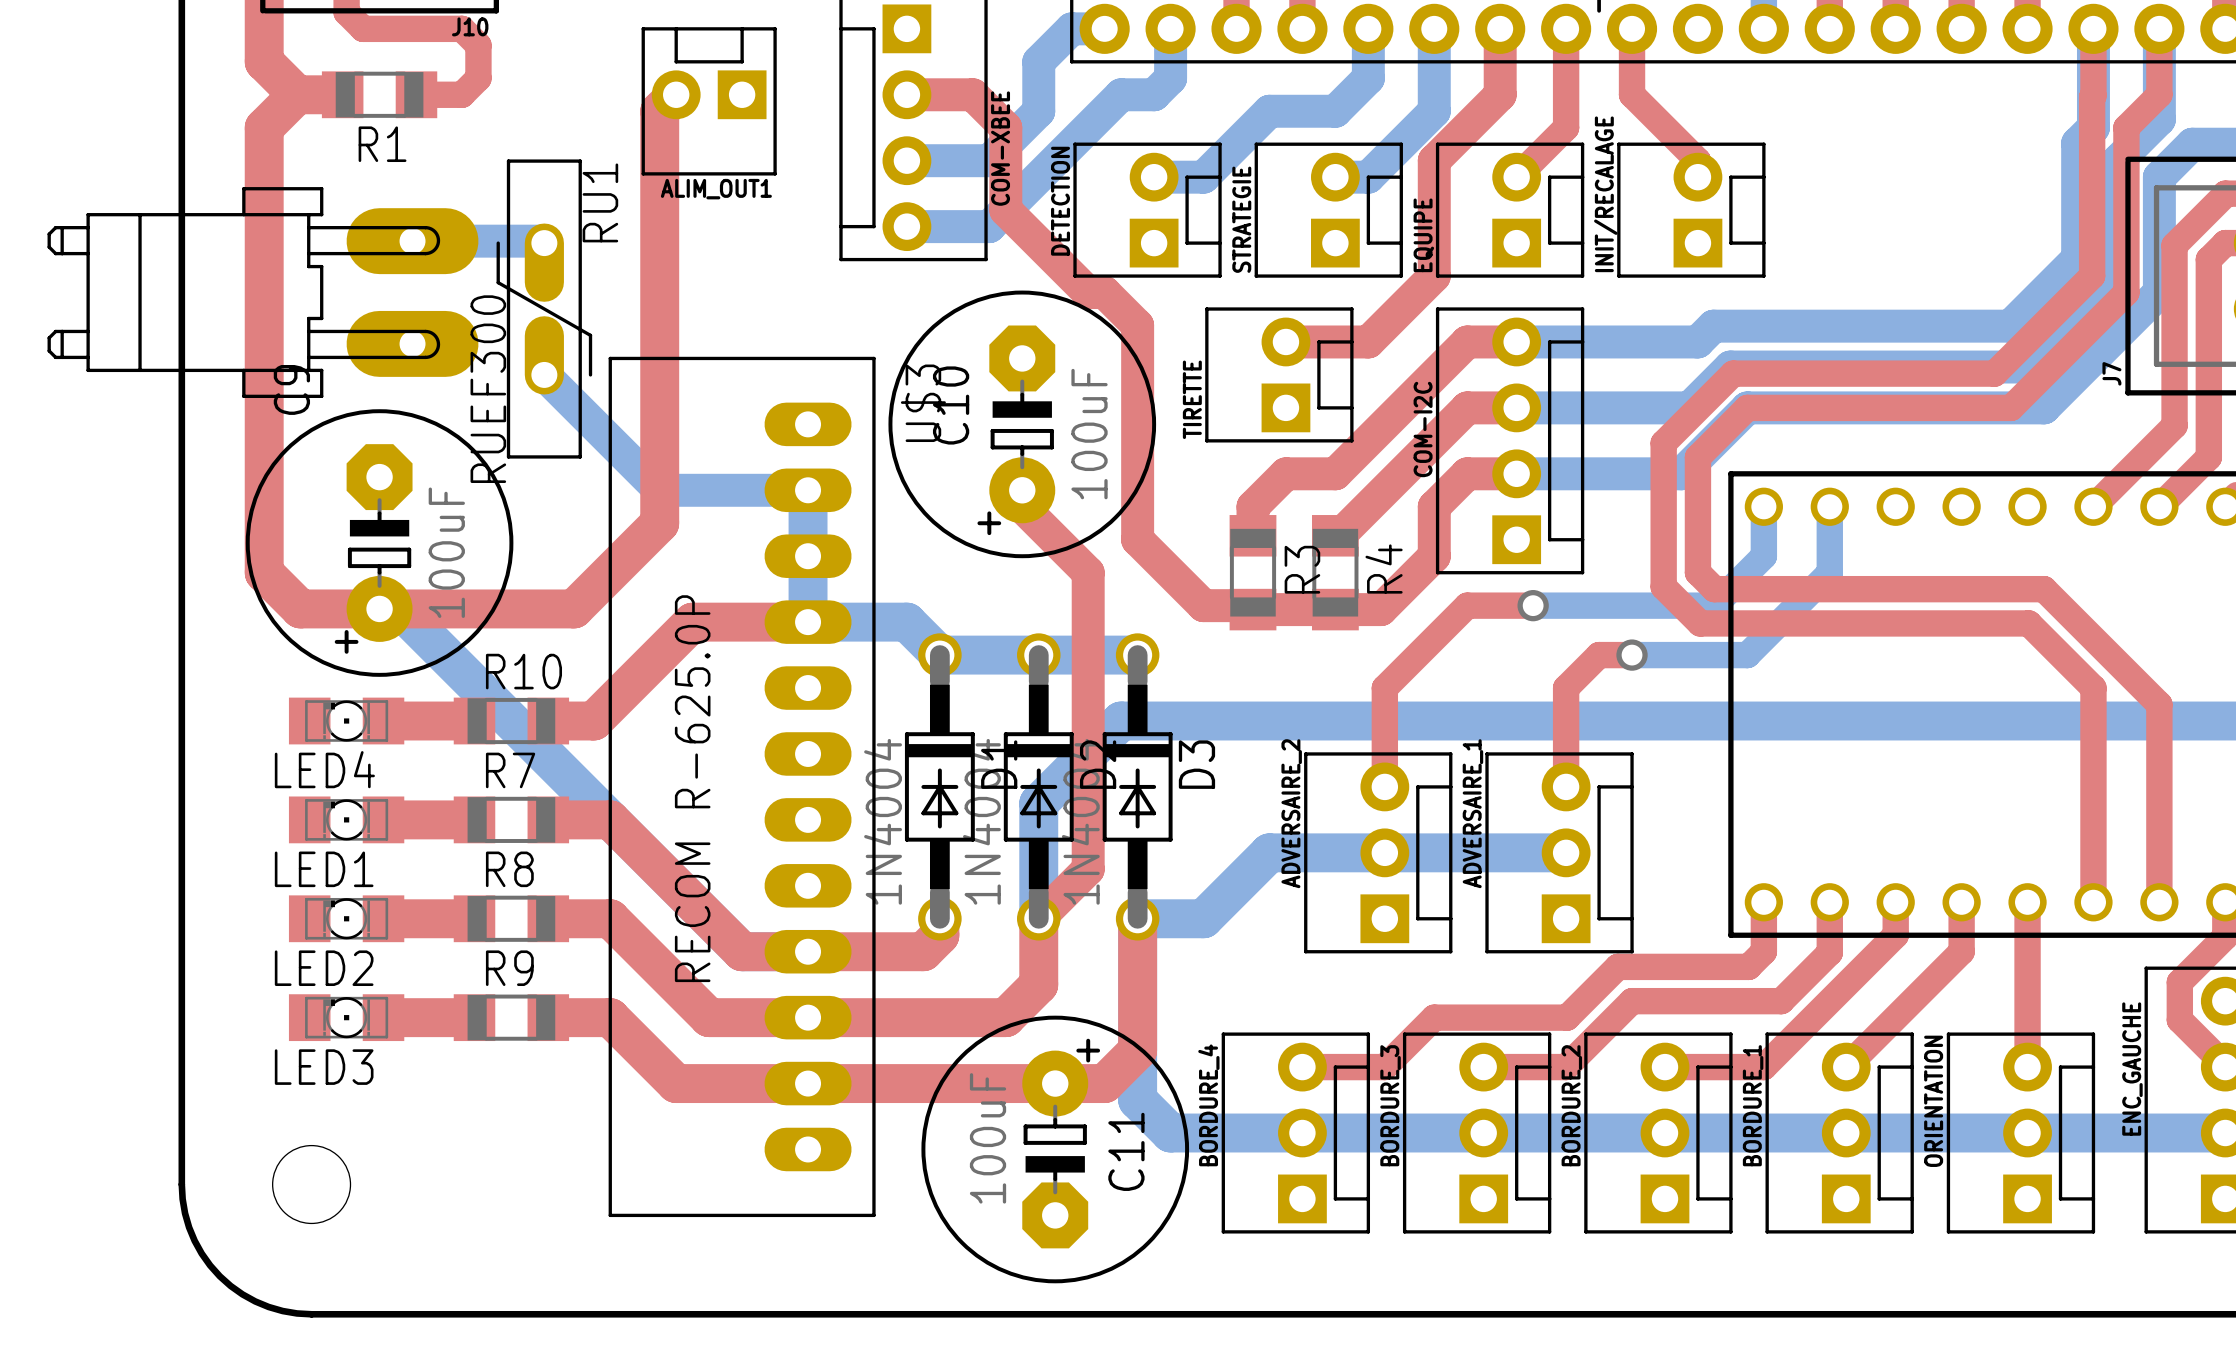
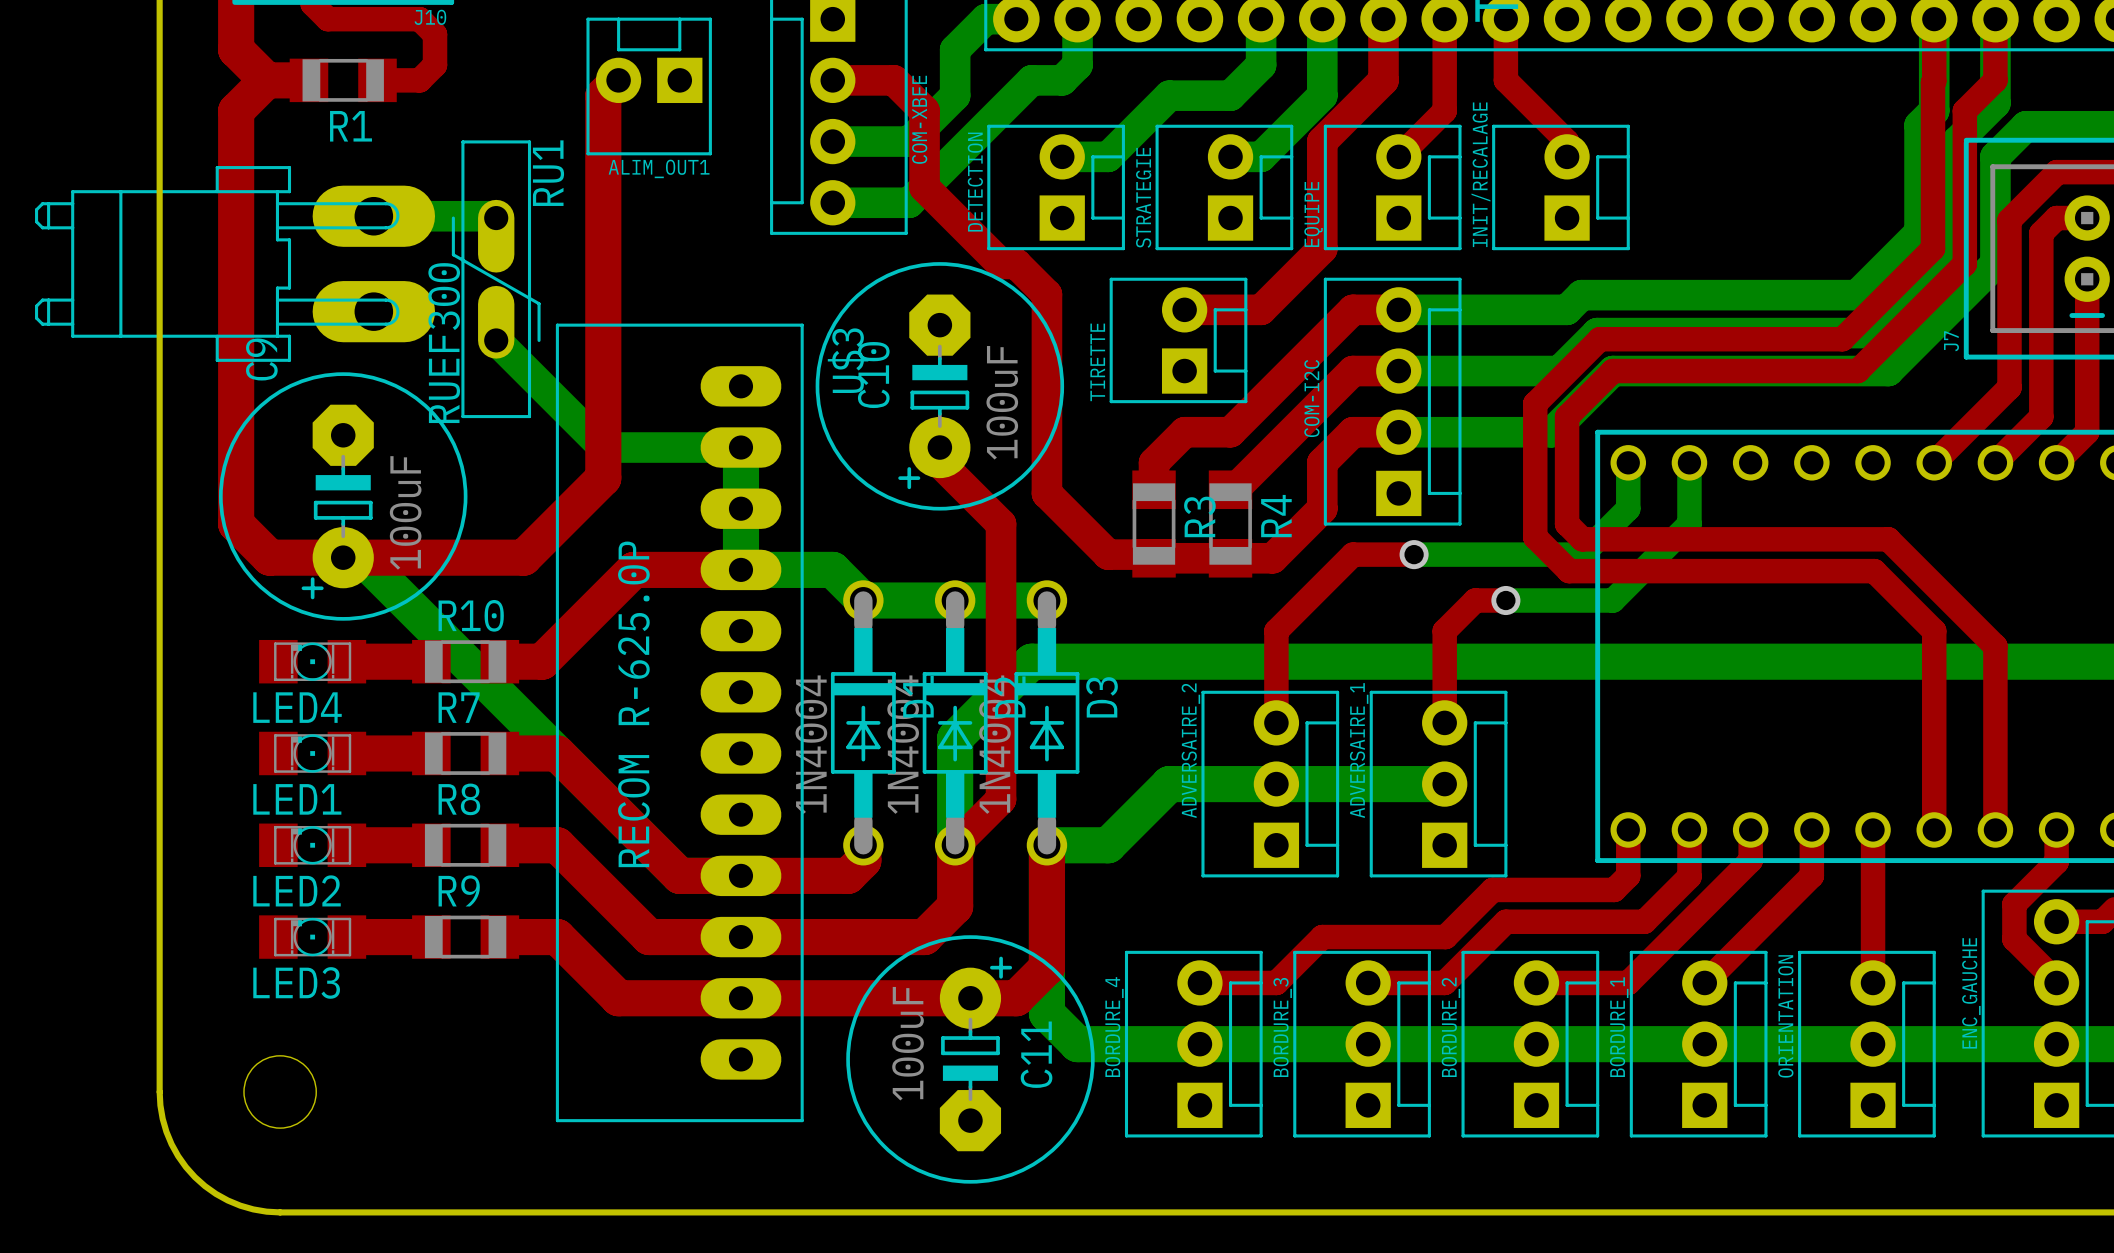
part footprint: [47, 187, 479, 398] -> [35, 166, 436, 362]

